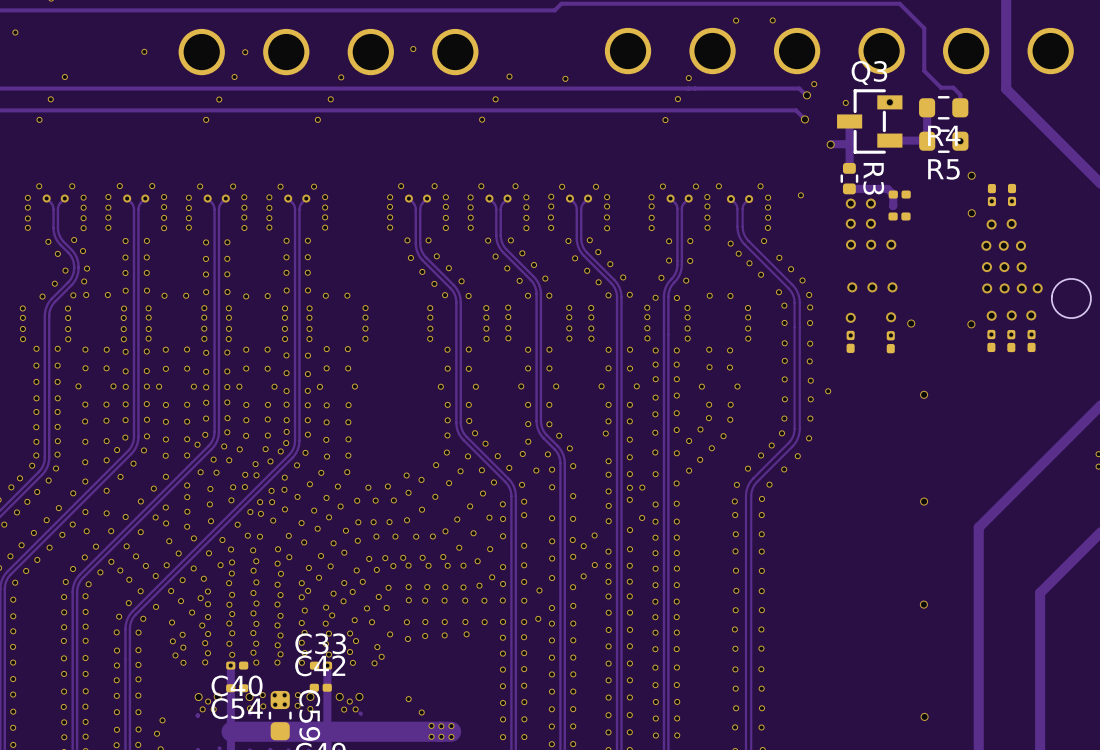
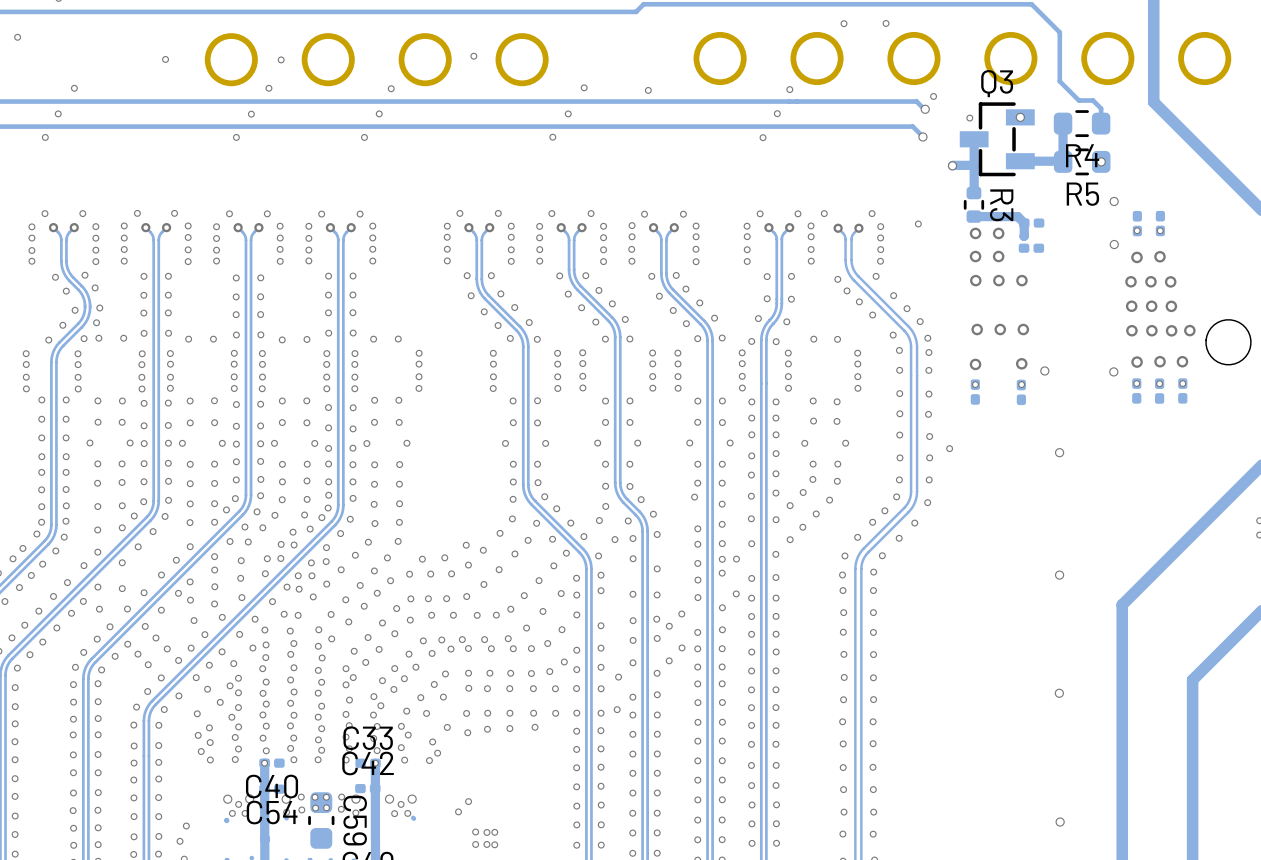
via: none -> (458, 811)
via: (421, 712) -> none
via: none -> (475, 832)
via: none -> (486, 832)
via: (441, 726) -> none
via: (451, 726) -> none
track: (451, 731) (231, 731) -> none
via: none -> (475, 844)
via: none -> (486, 844)
via: (441, 736) -> none
via: (451, 736) -> none

